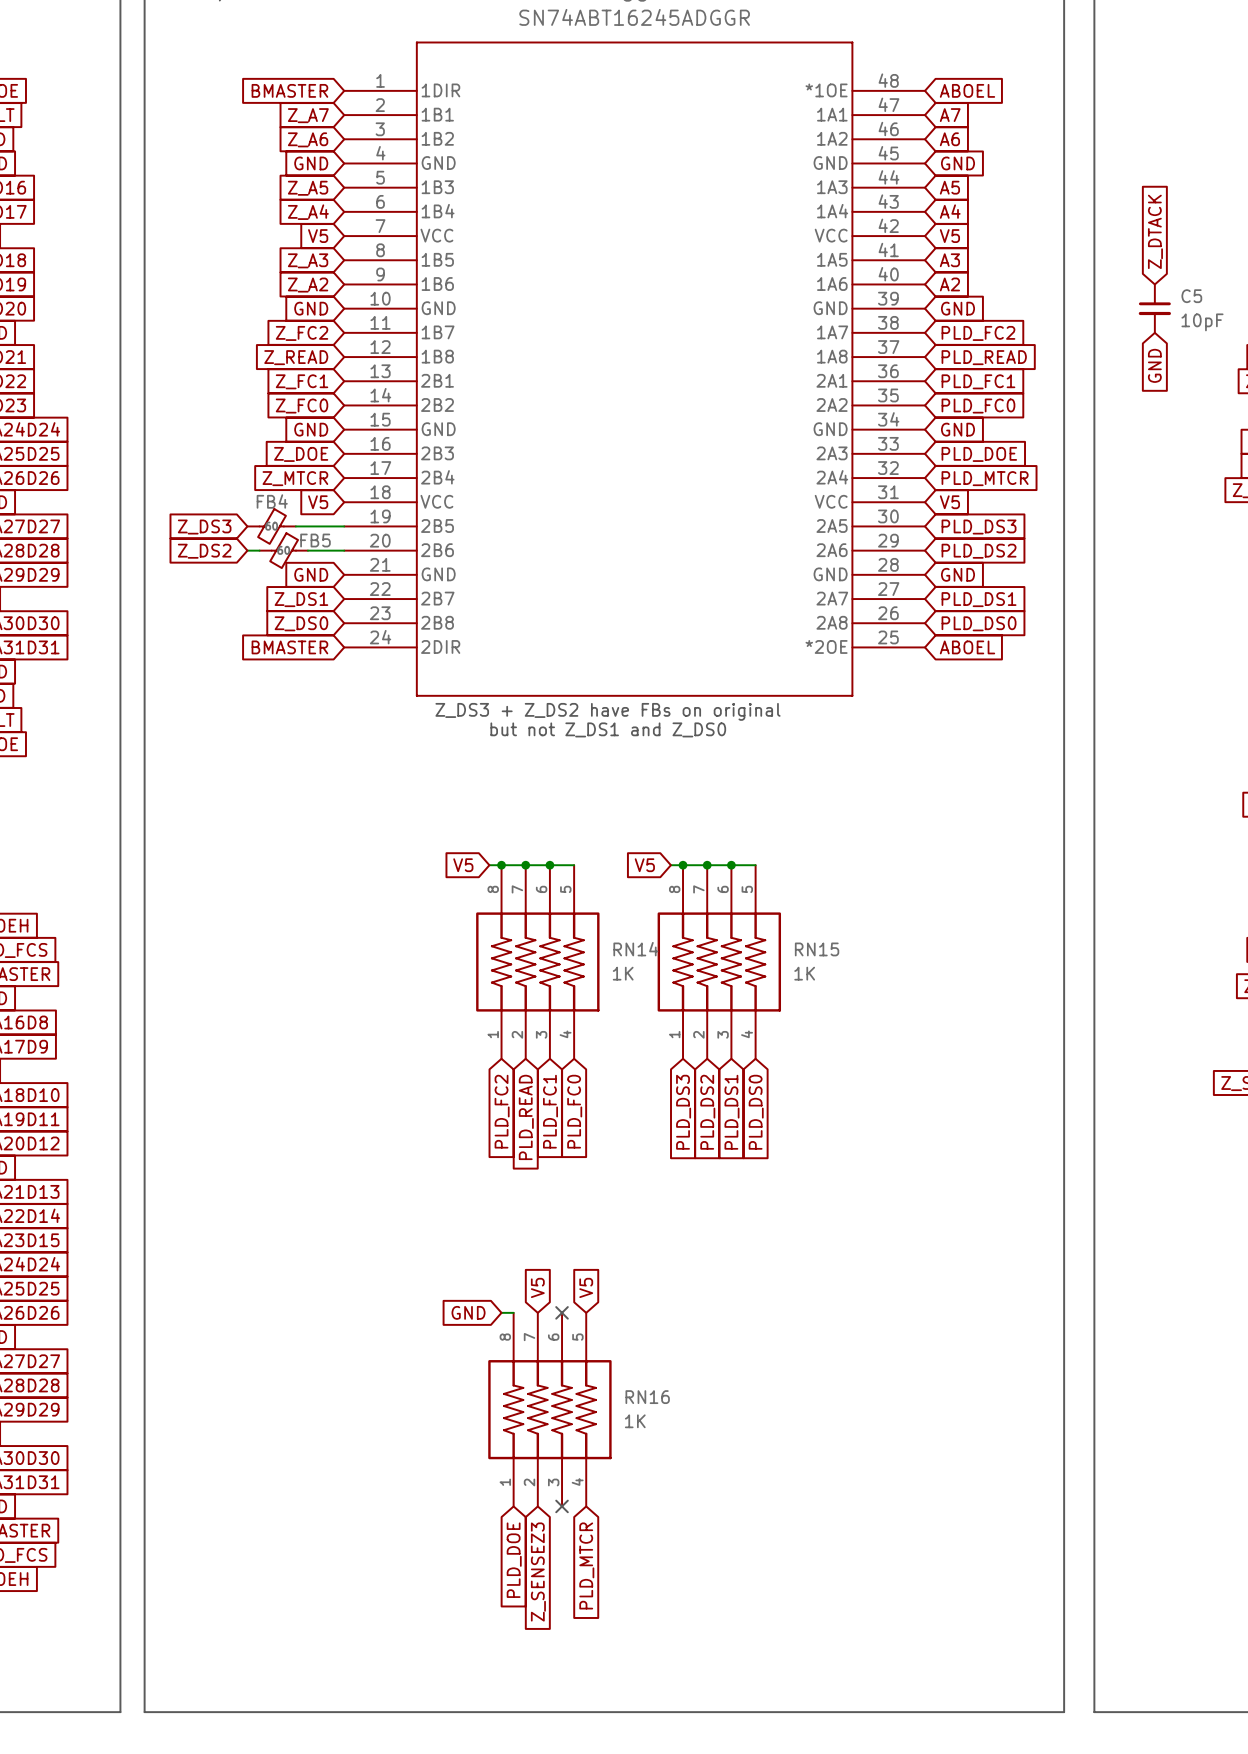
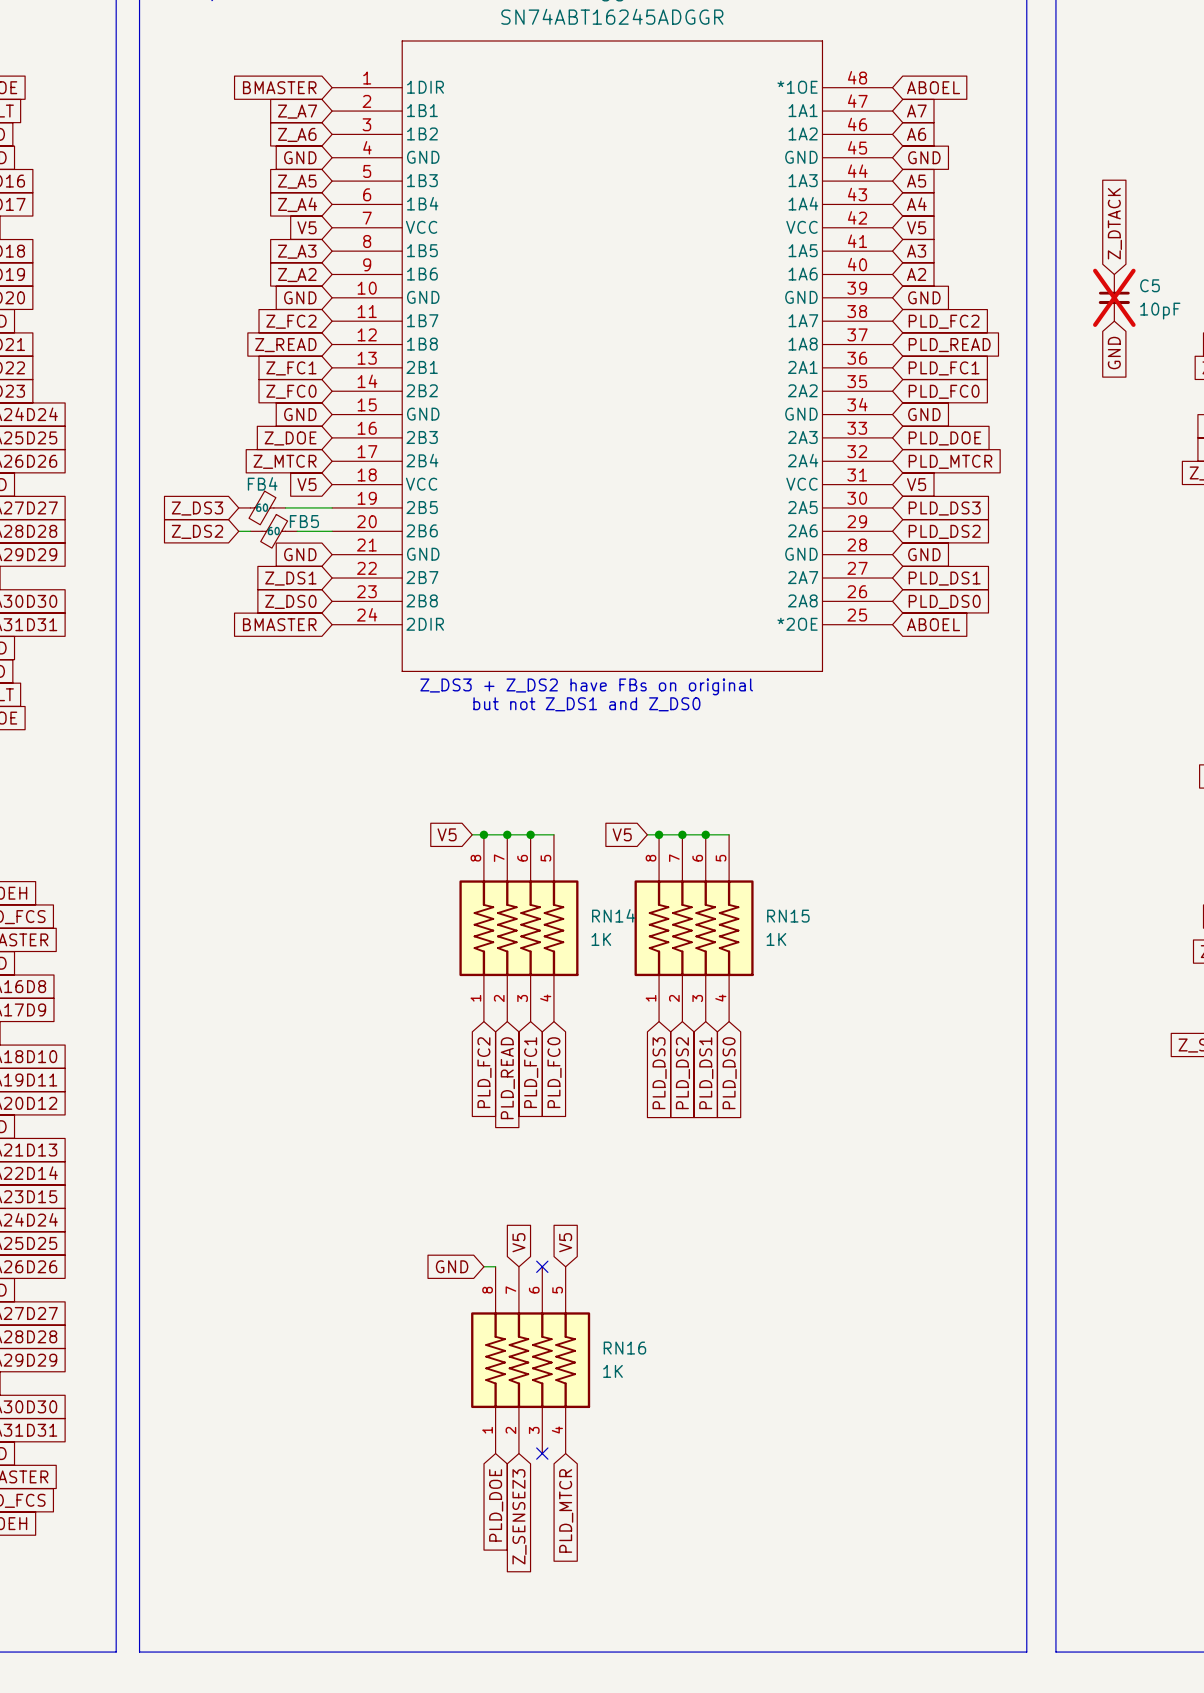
C5 do-not-place cross: none -> (1114, 297)

